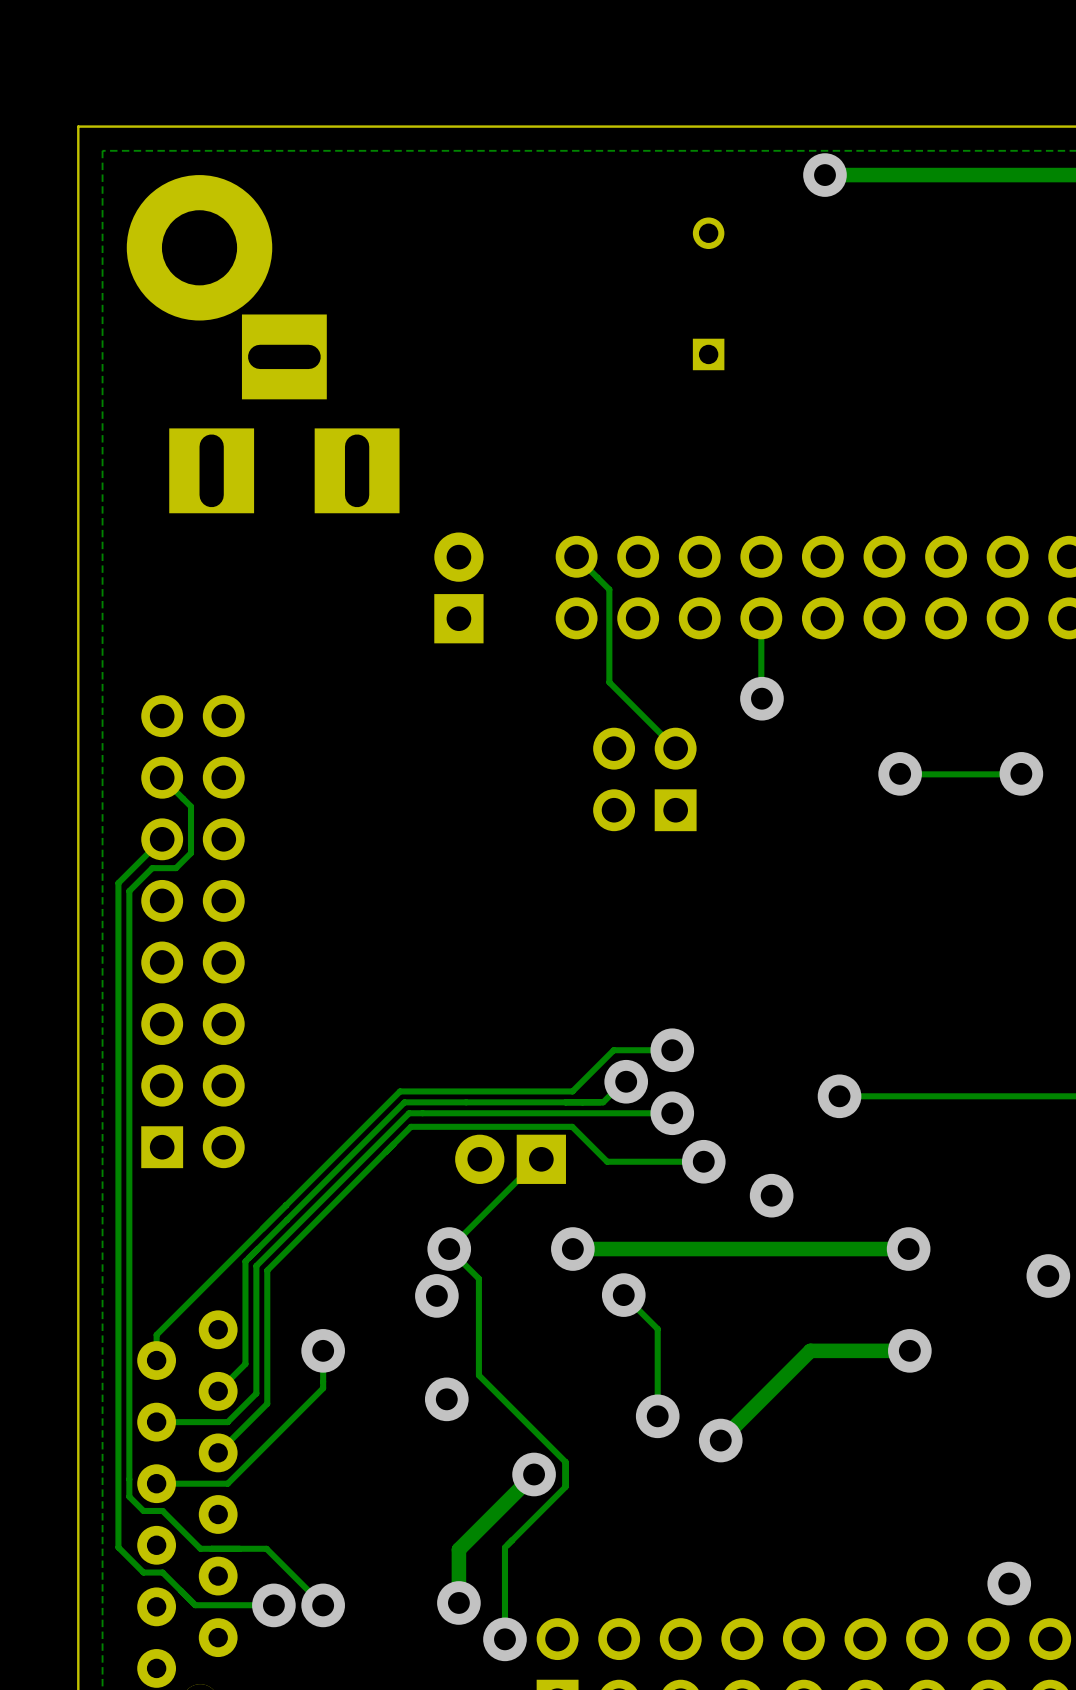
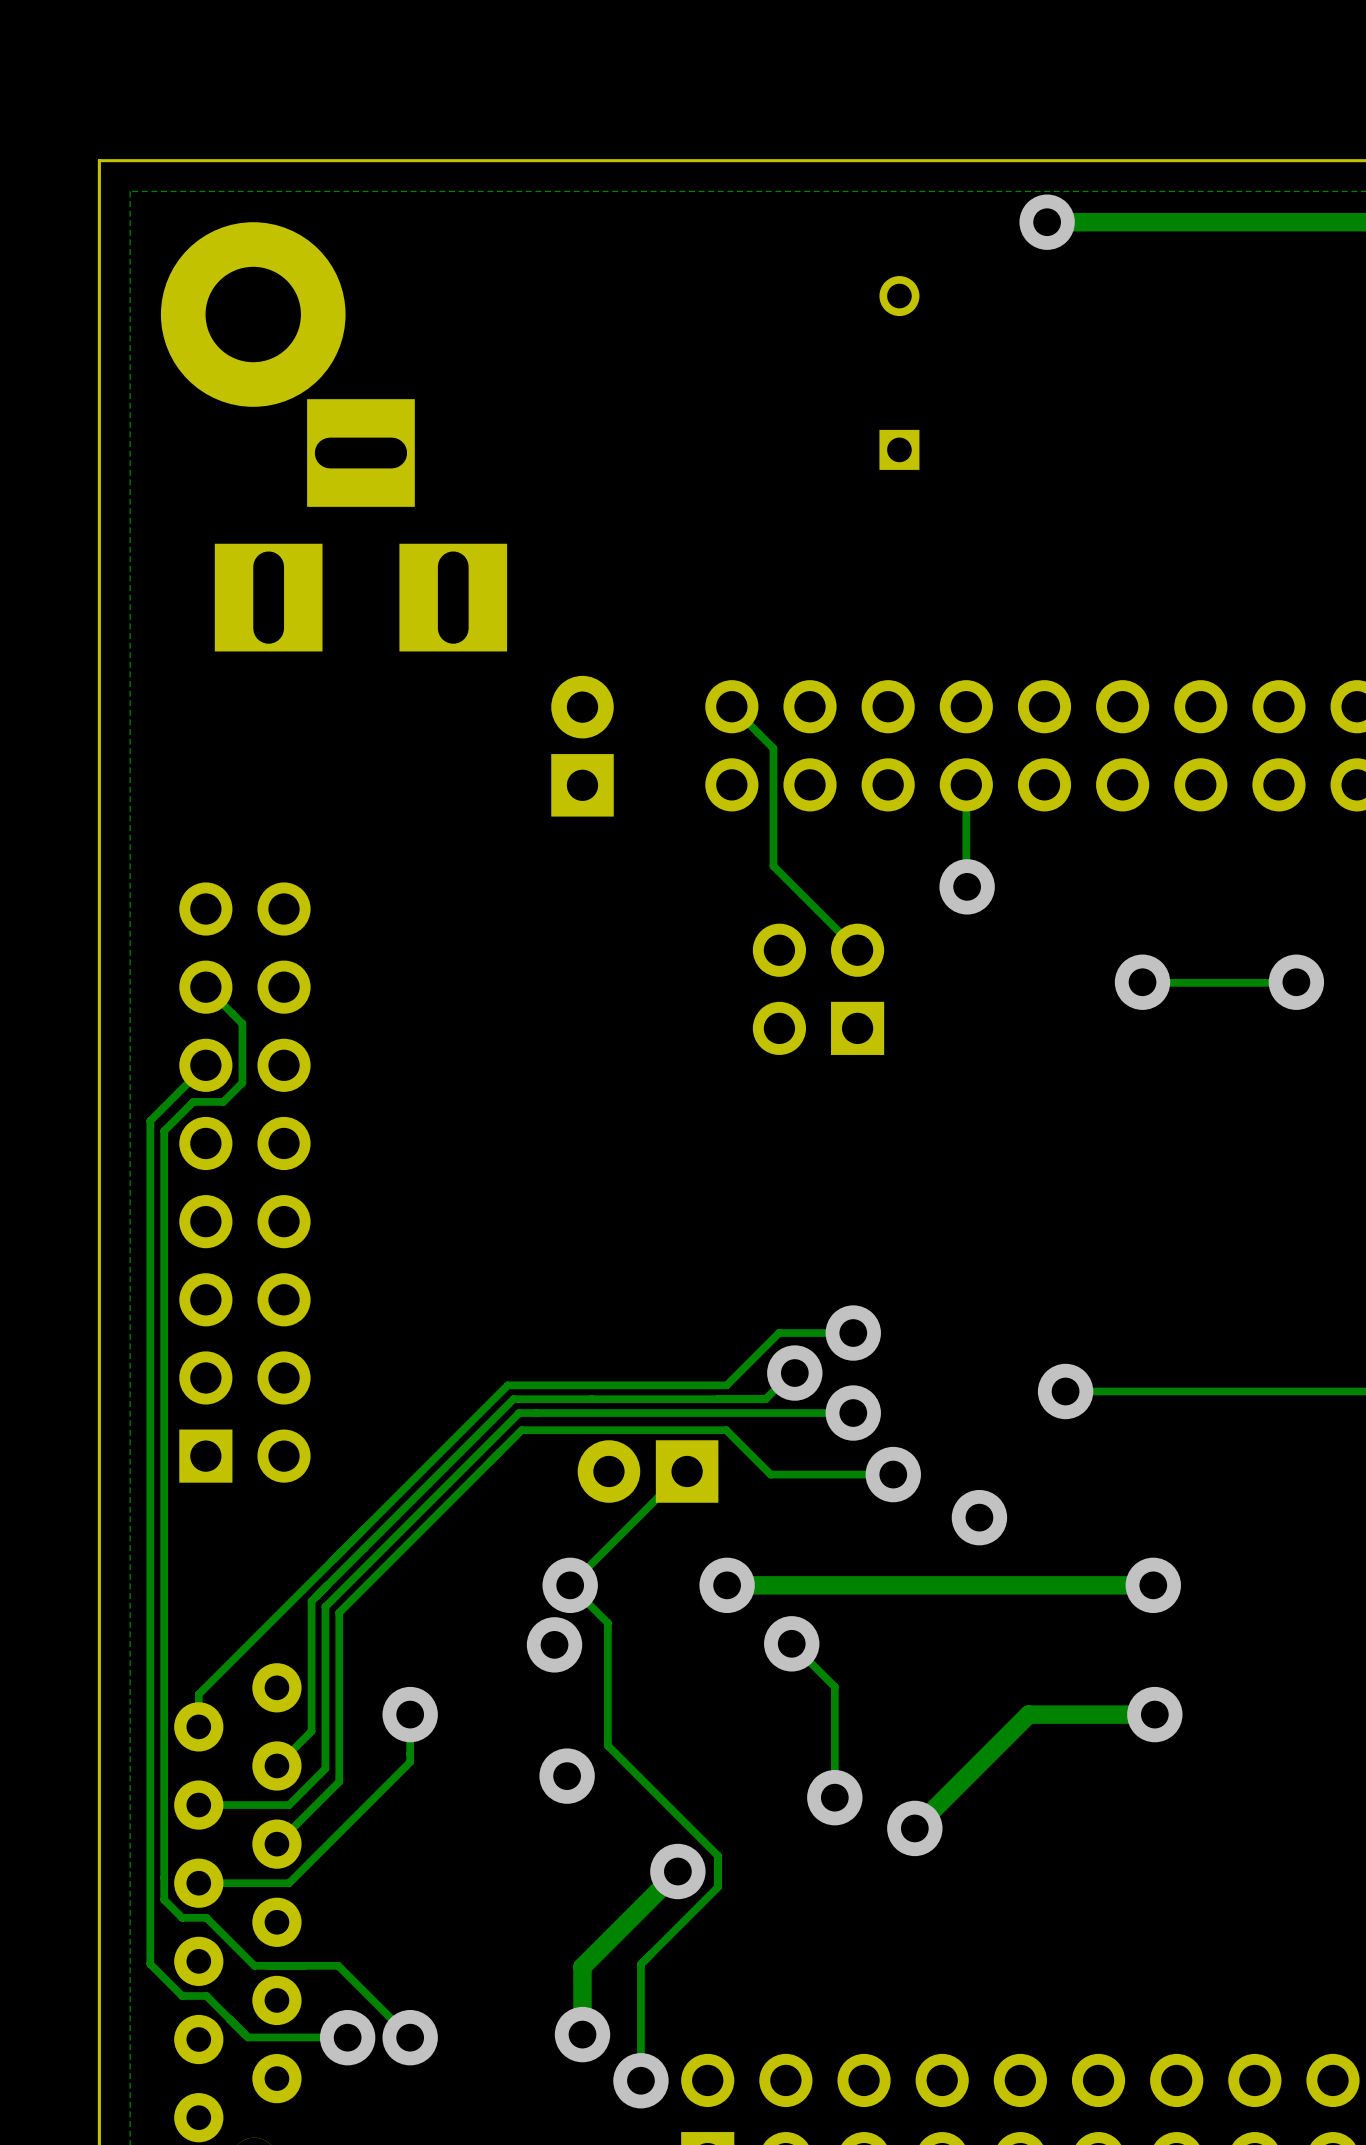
via: (1048, 1276) -> none
via: (1009, 1583) -> none

